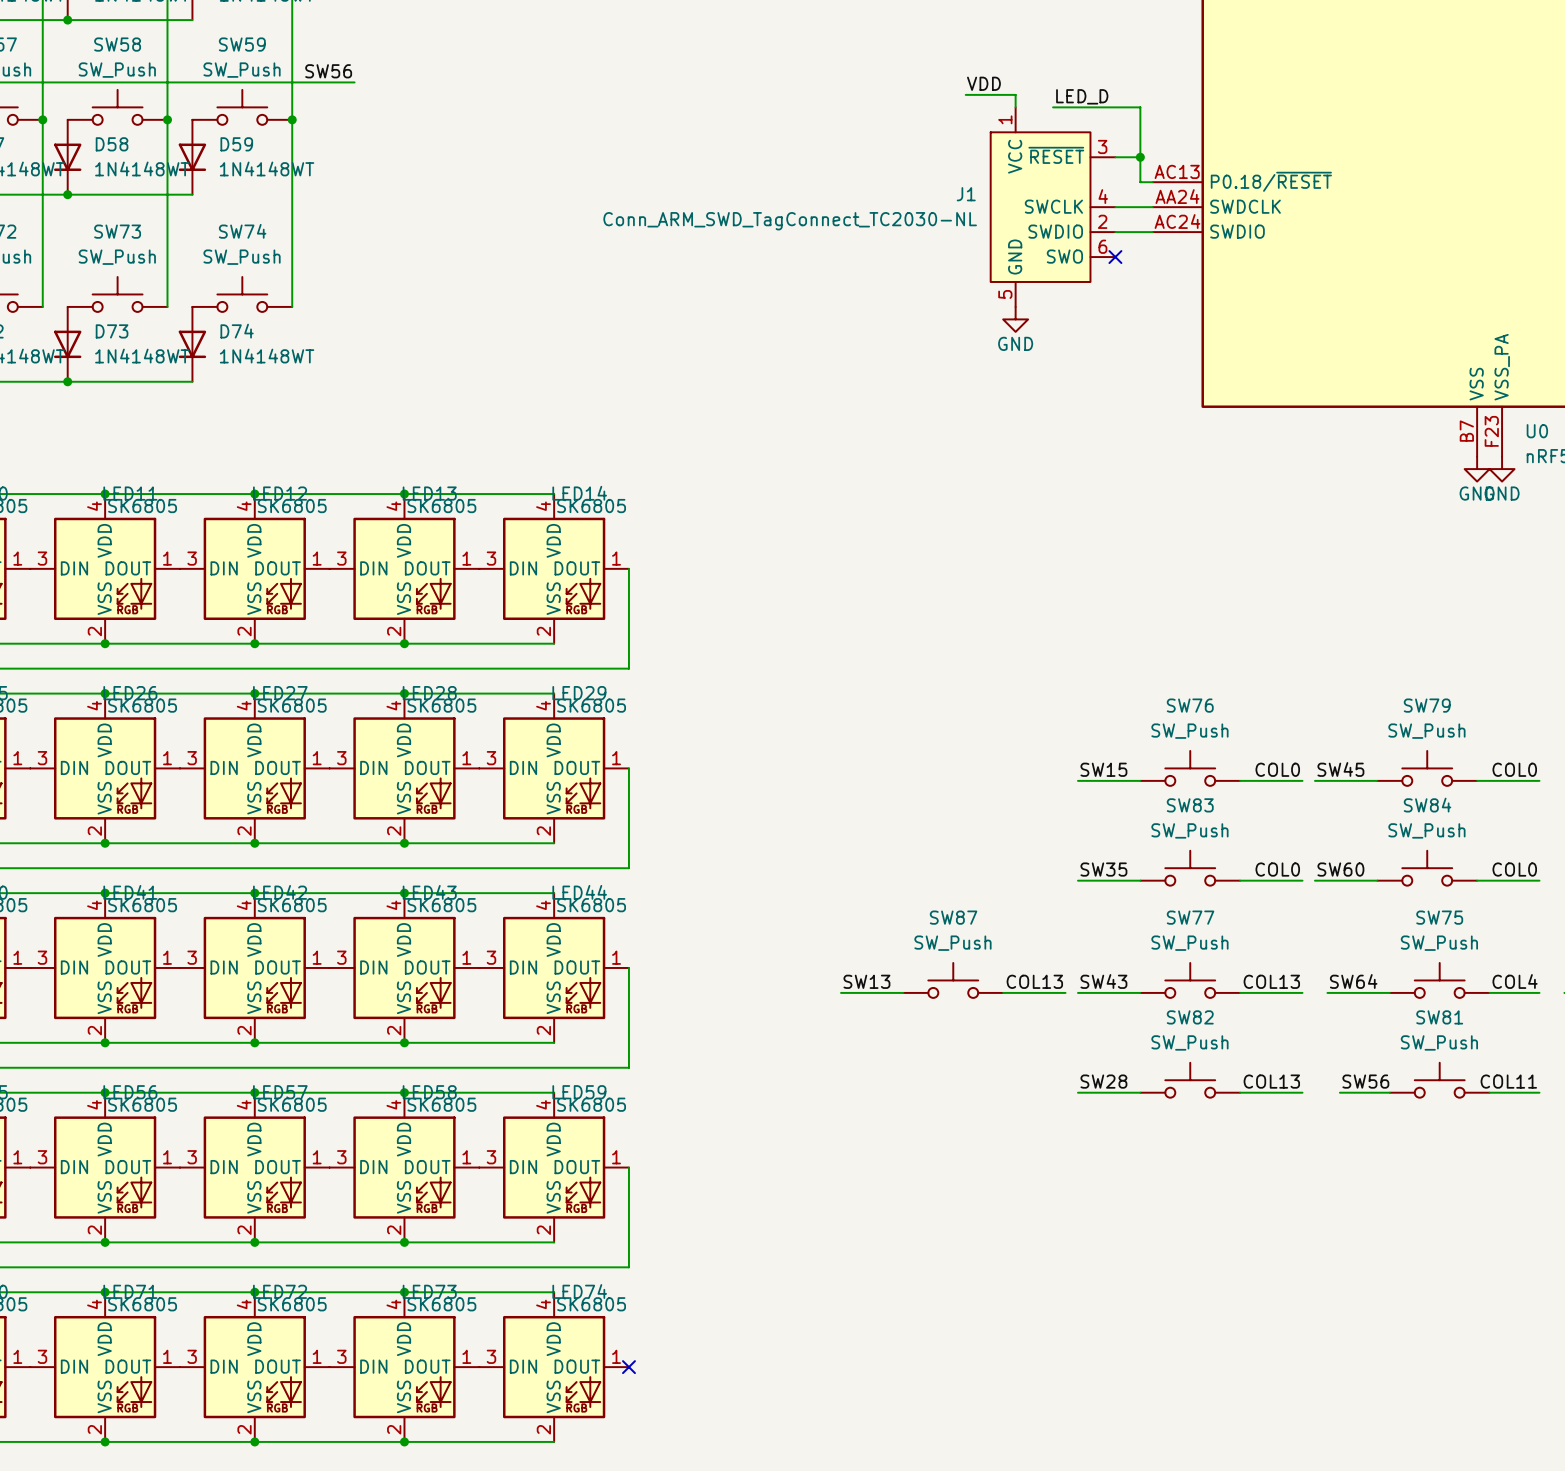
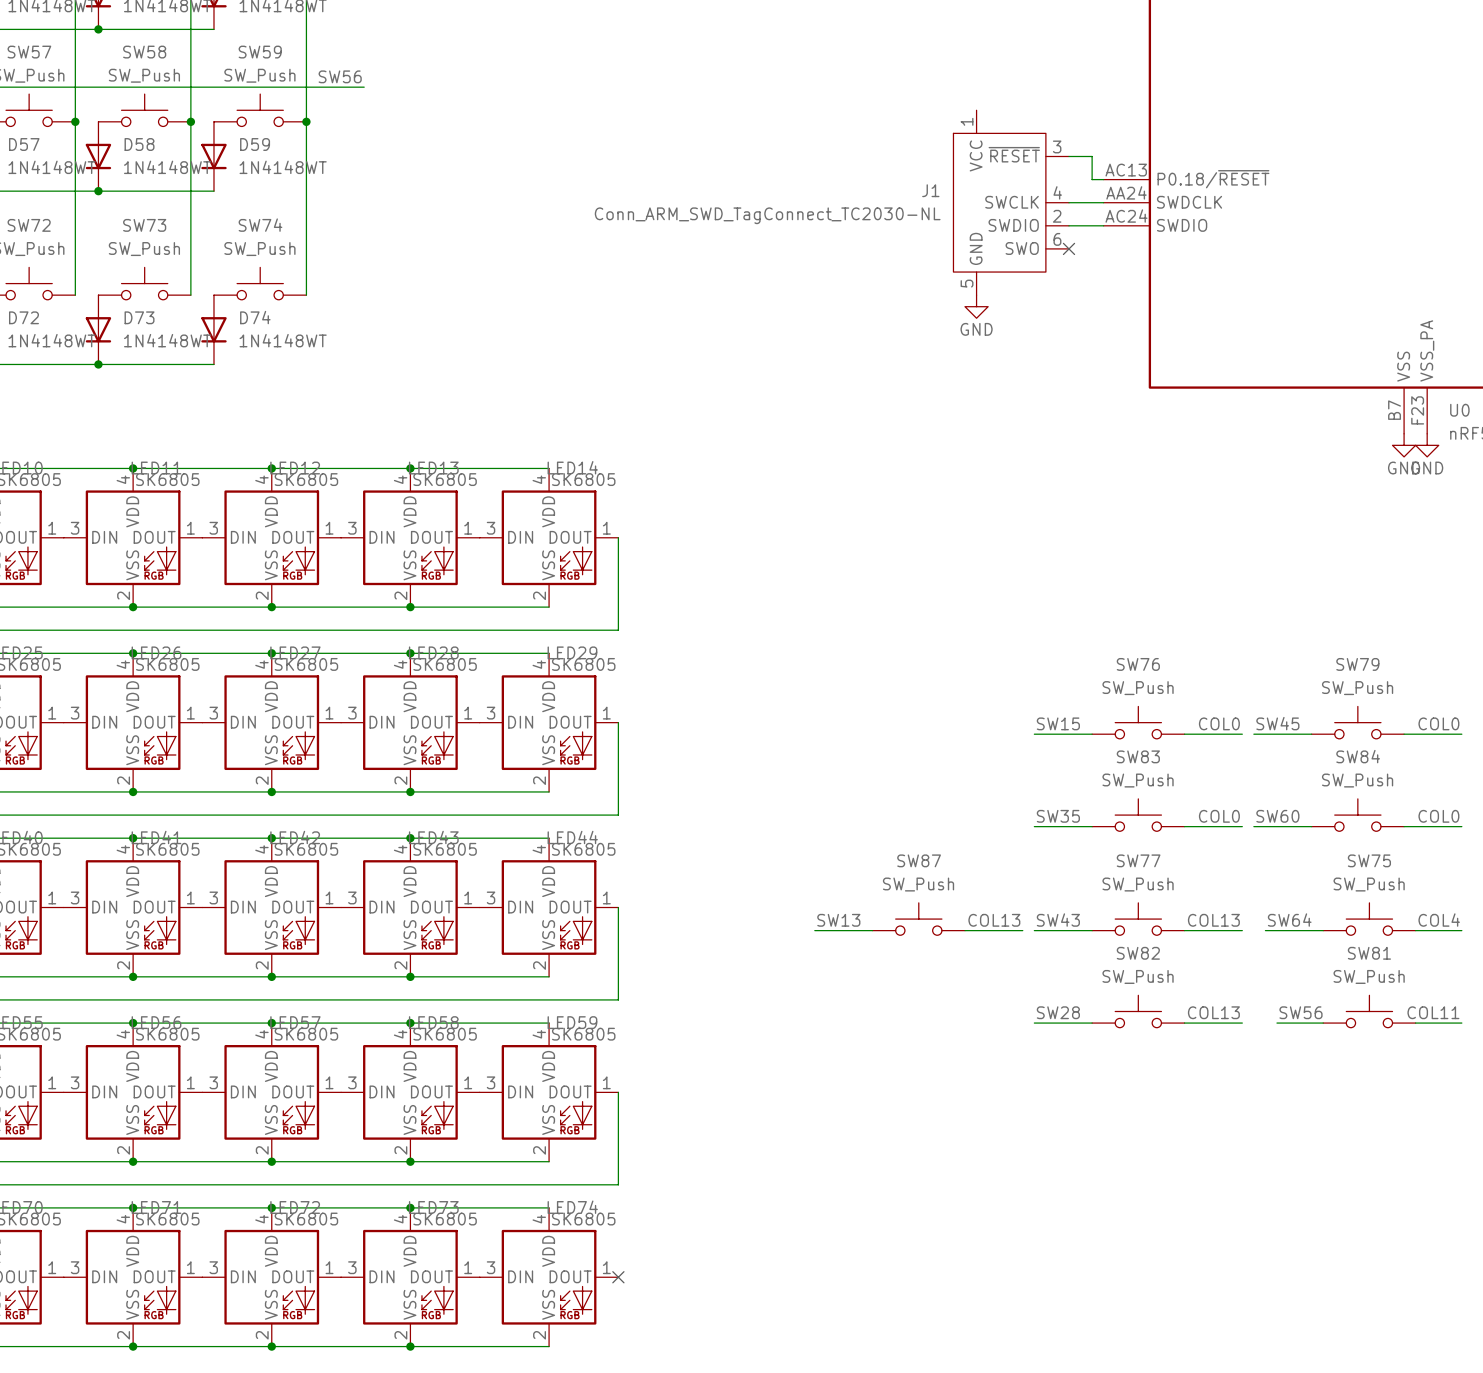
label: VDD (983, 83) -> none
wire: (965, 94) (1015, 94) (1015, 107) -> none
label: LED_D (1082, 96) -> none
wire: (1053, 107) (1140, 107) (1140, 157) -> none
junction: (1140, 157) -> none

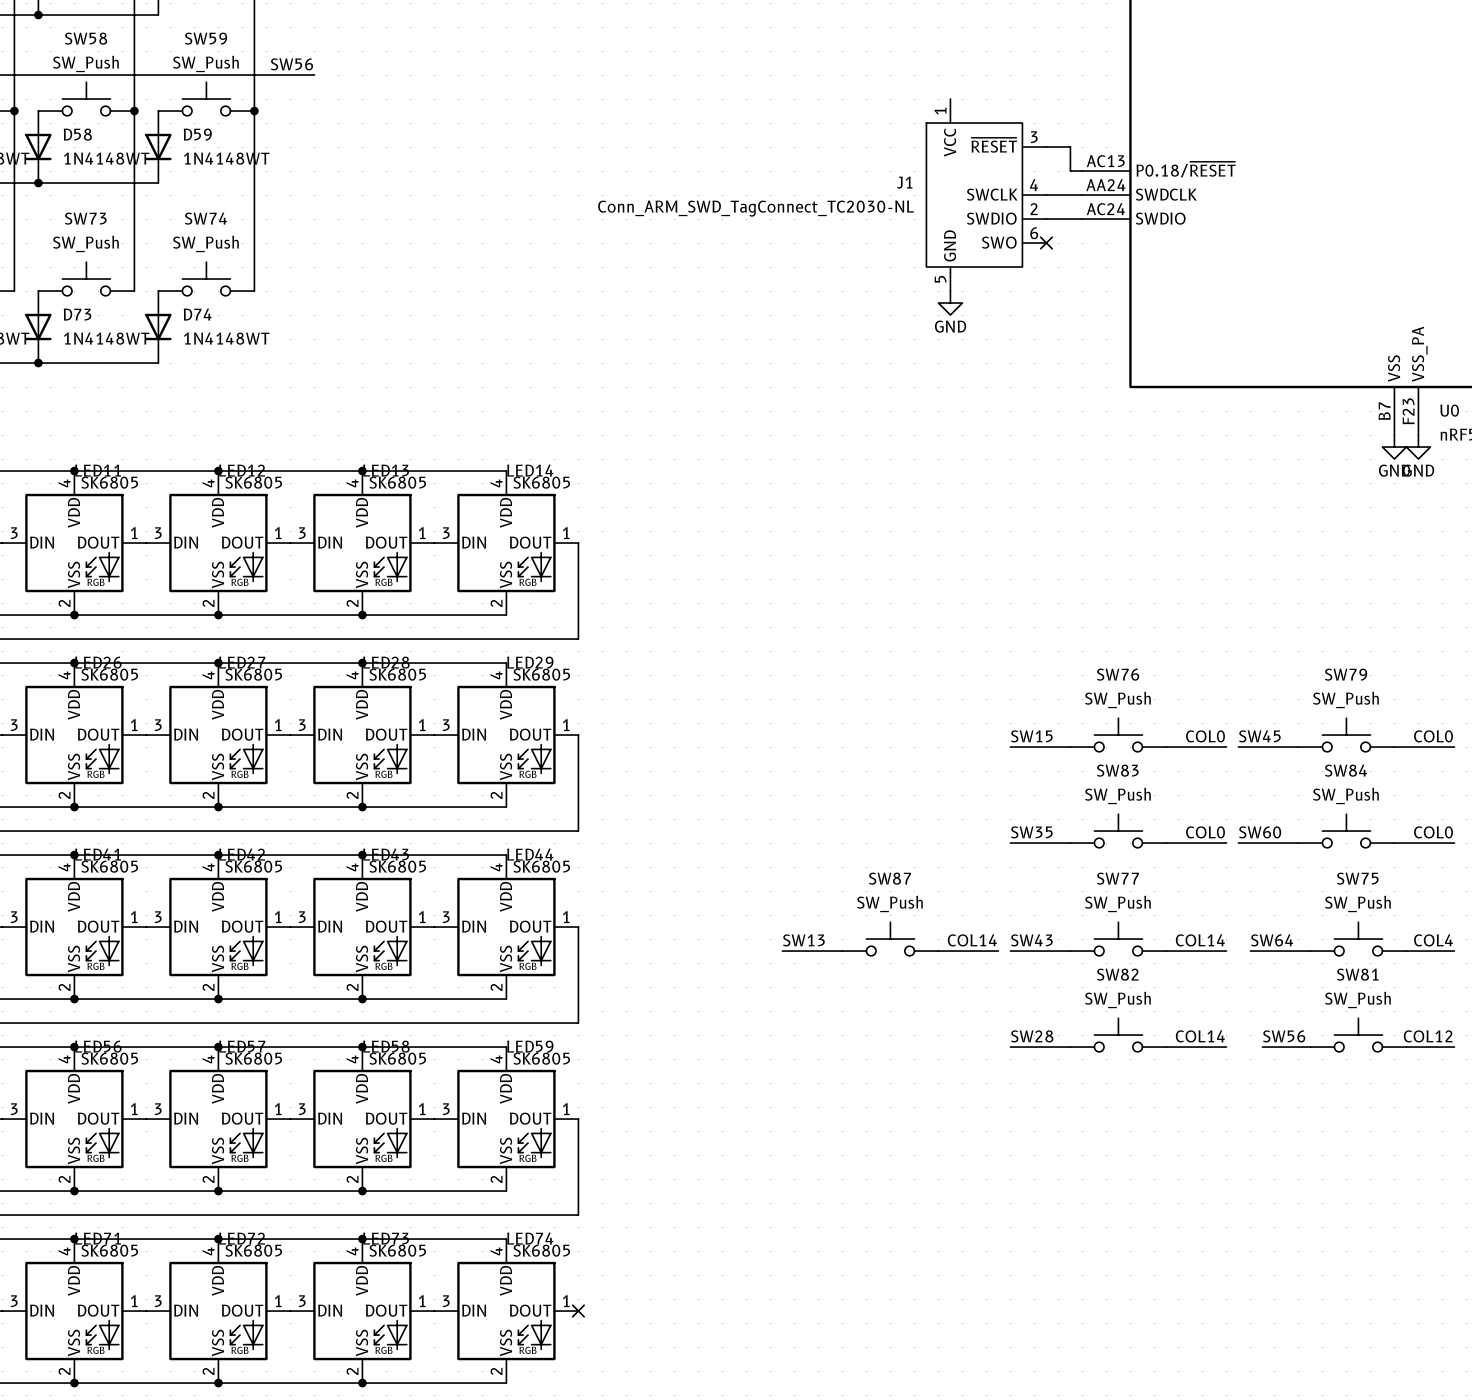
label: COL13 (994, 920) -> COL14 (972, 940)
label: COL13 (1213, 920) -> COL14 (1200, 940)
label: COL13 (1213, 1012) -> COL14 (1200, 1036)
label: COL11 (1433, 1012) -> COL12 (1428, 1036)

